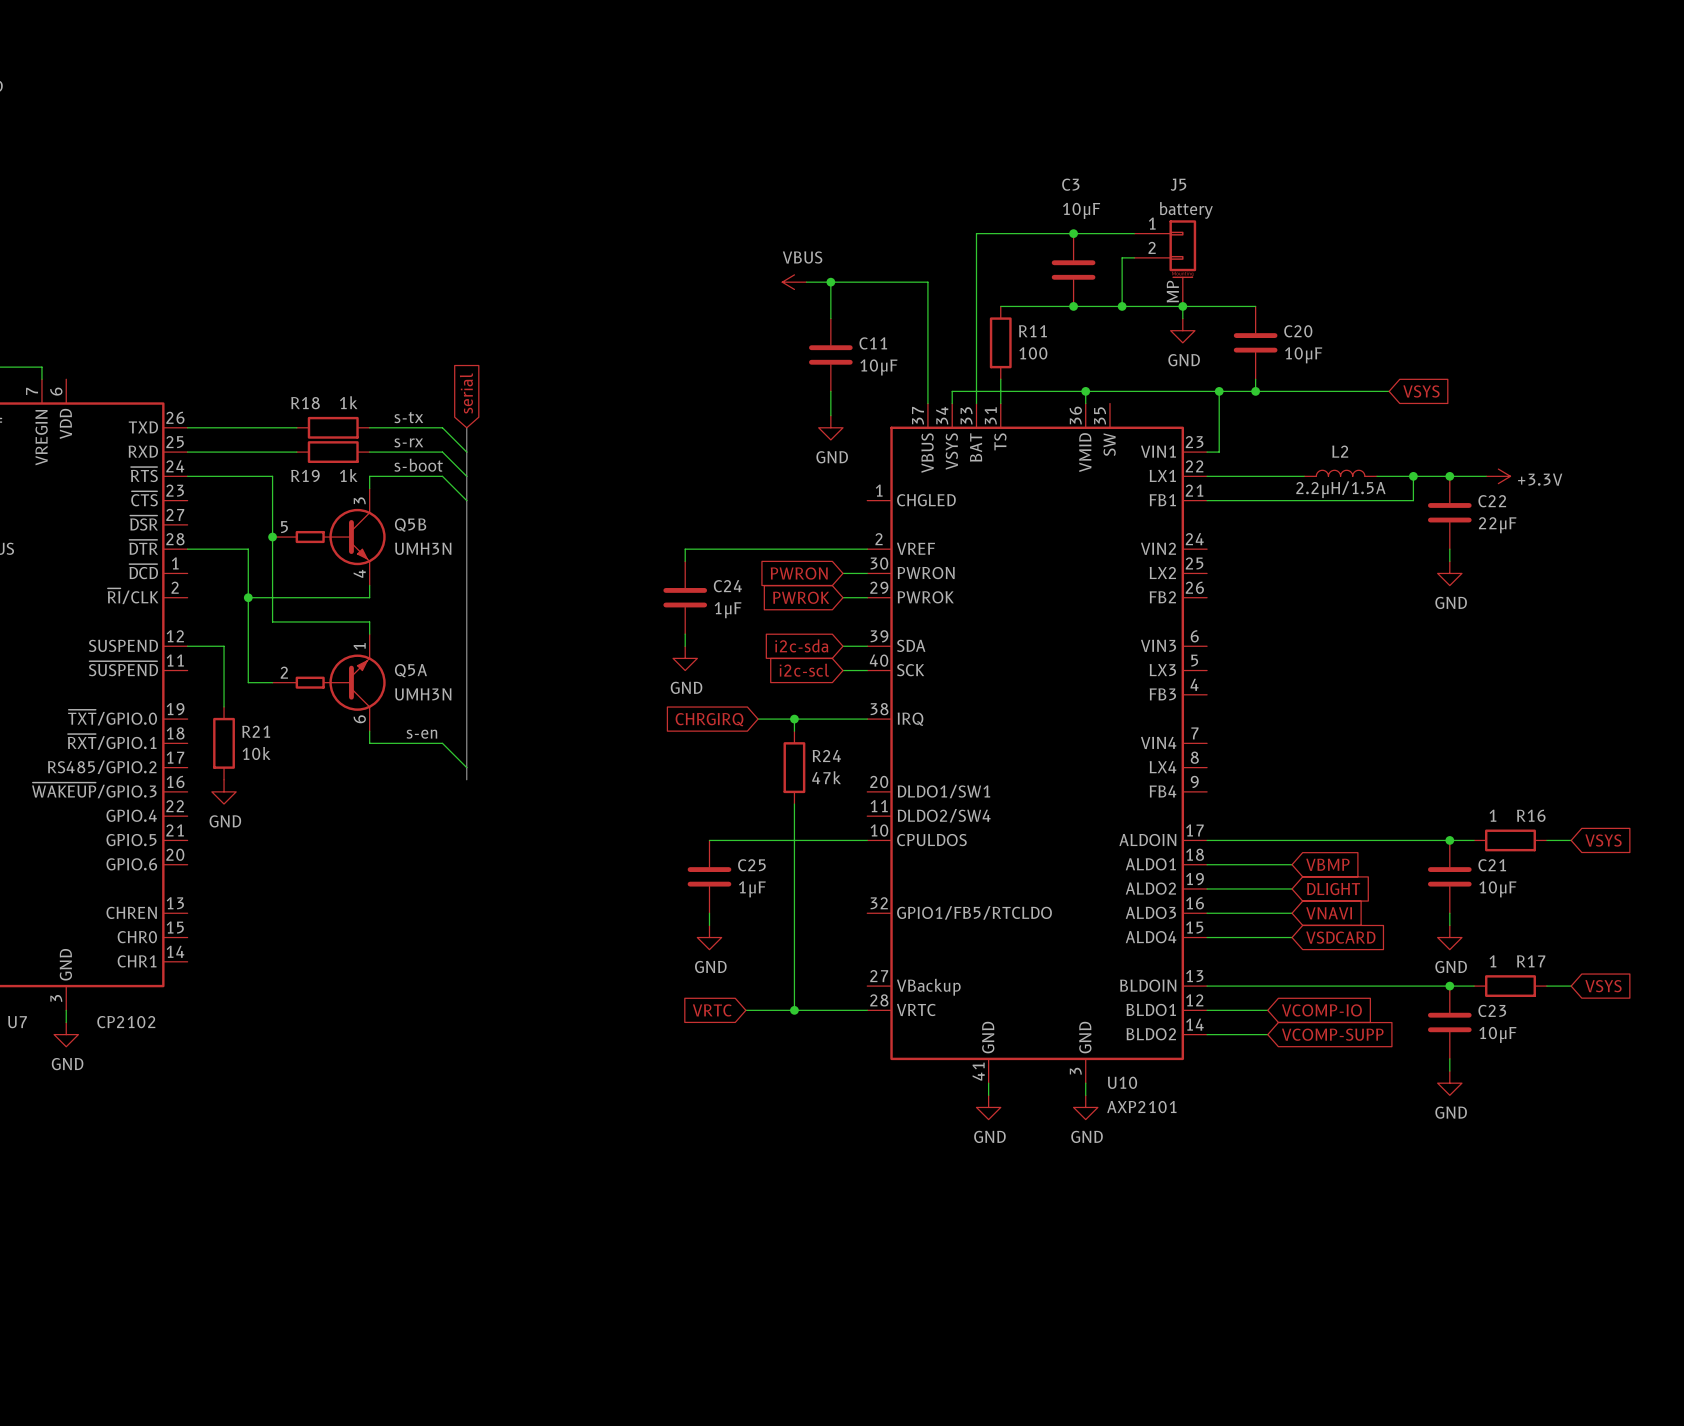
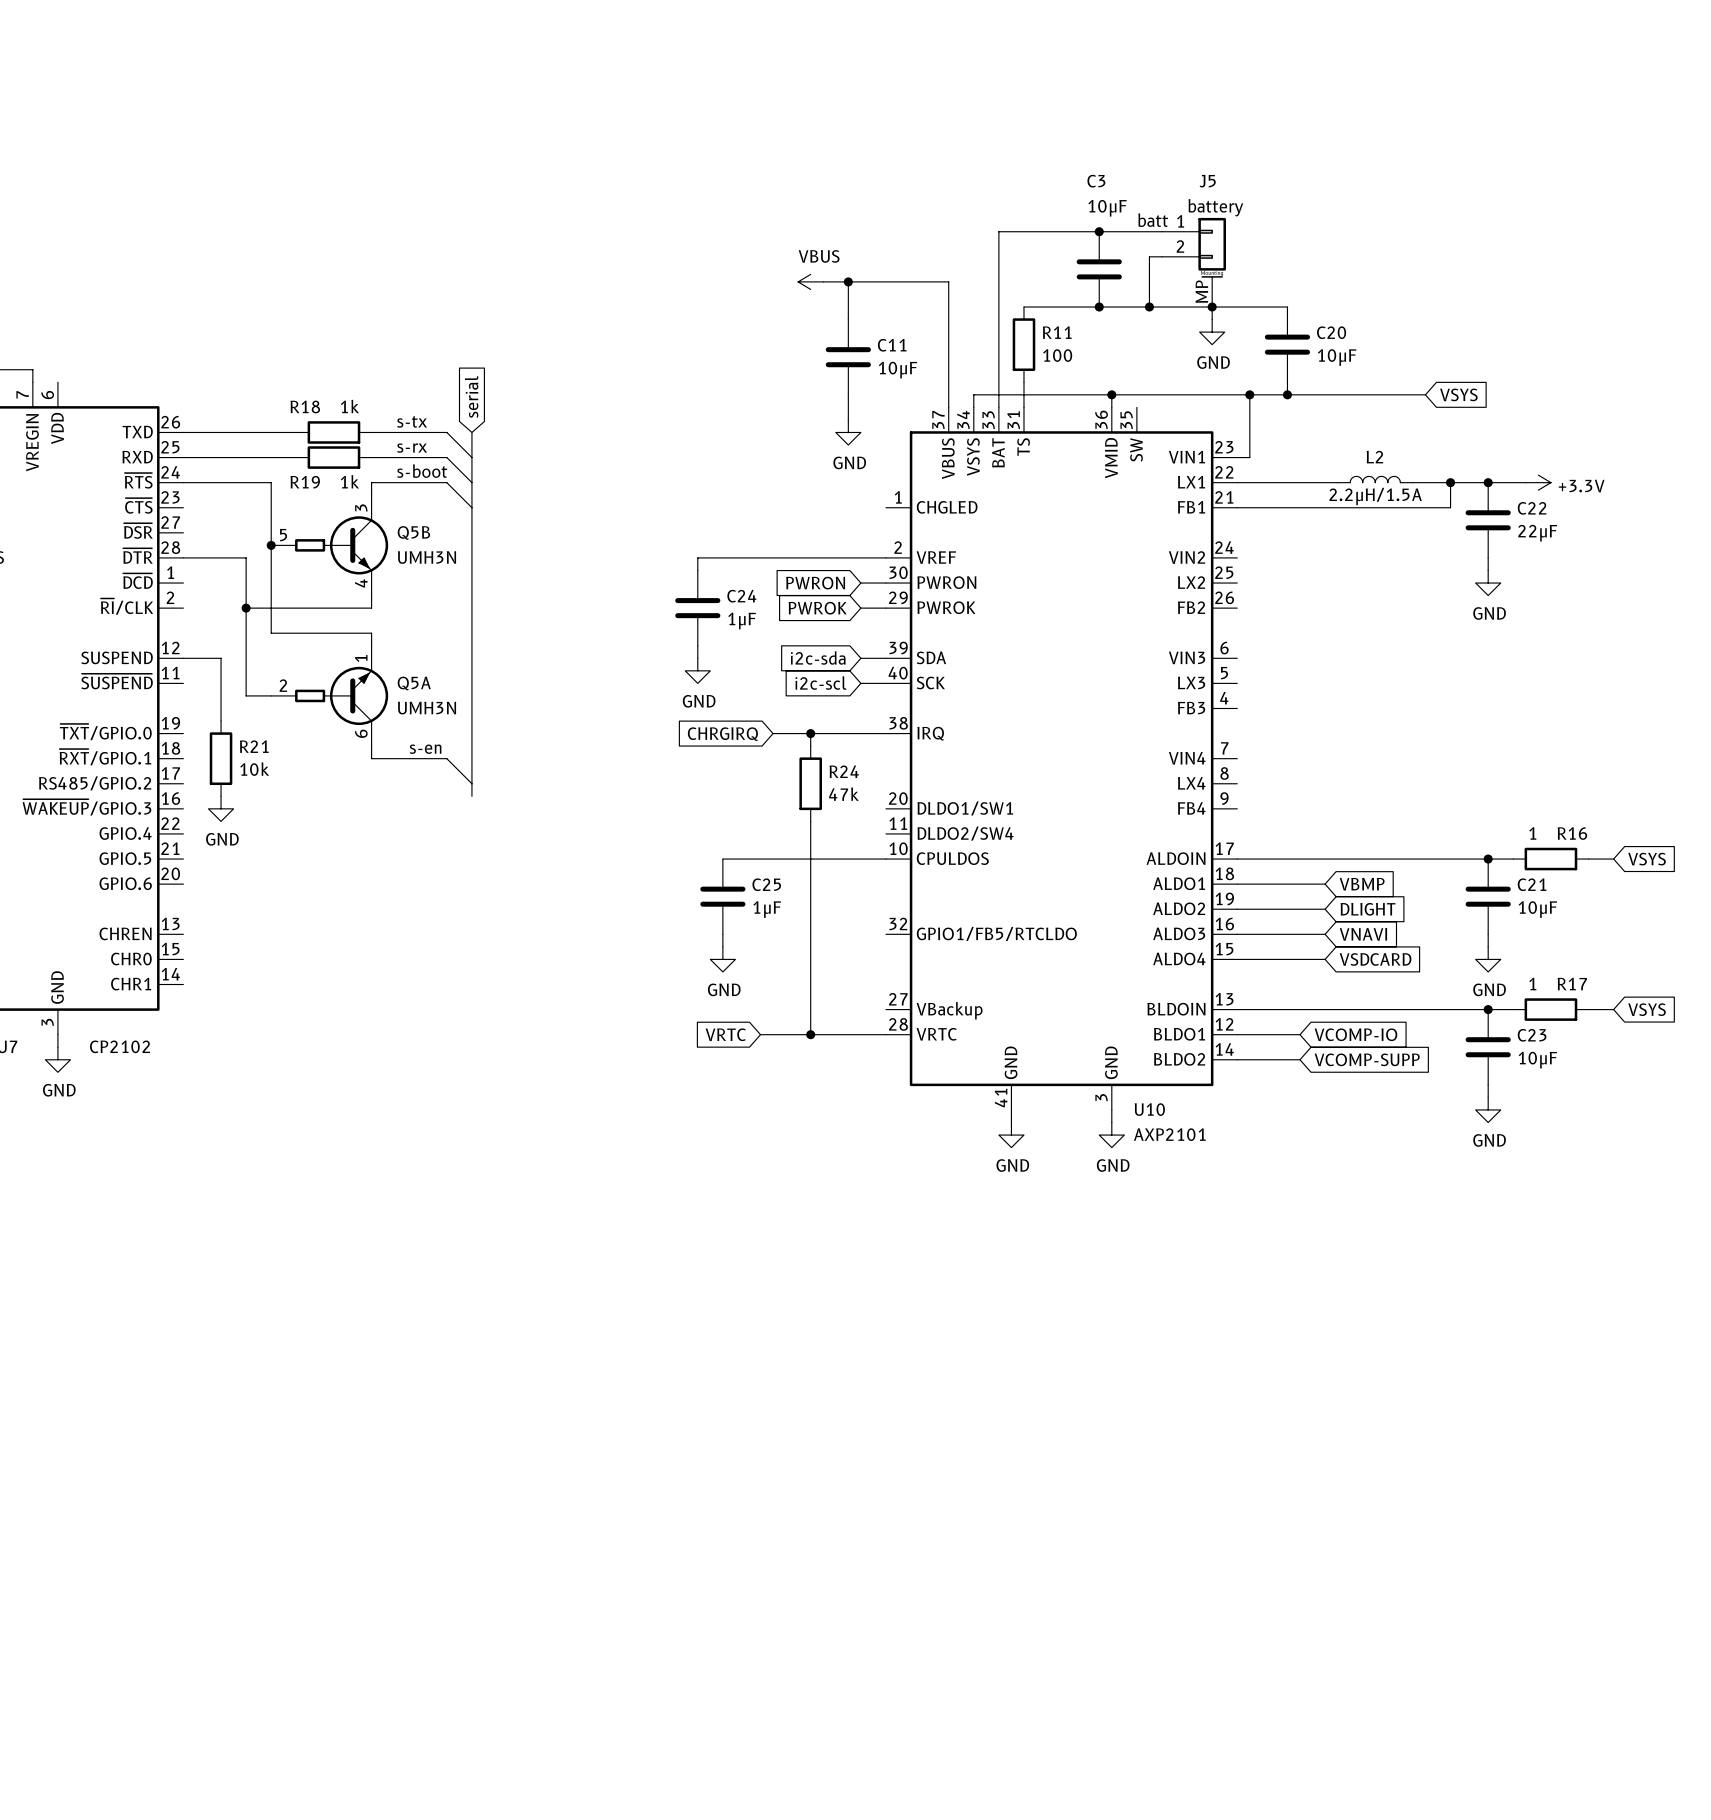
label: none -> batt (1153, 220)

